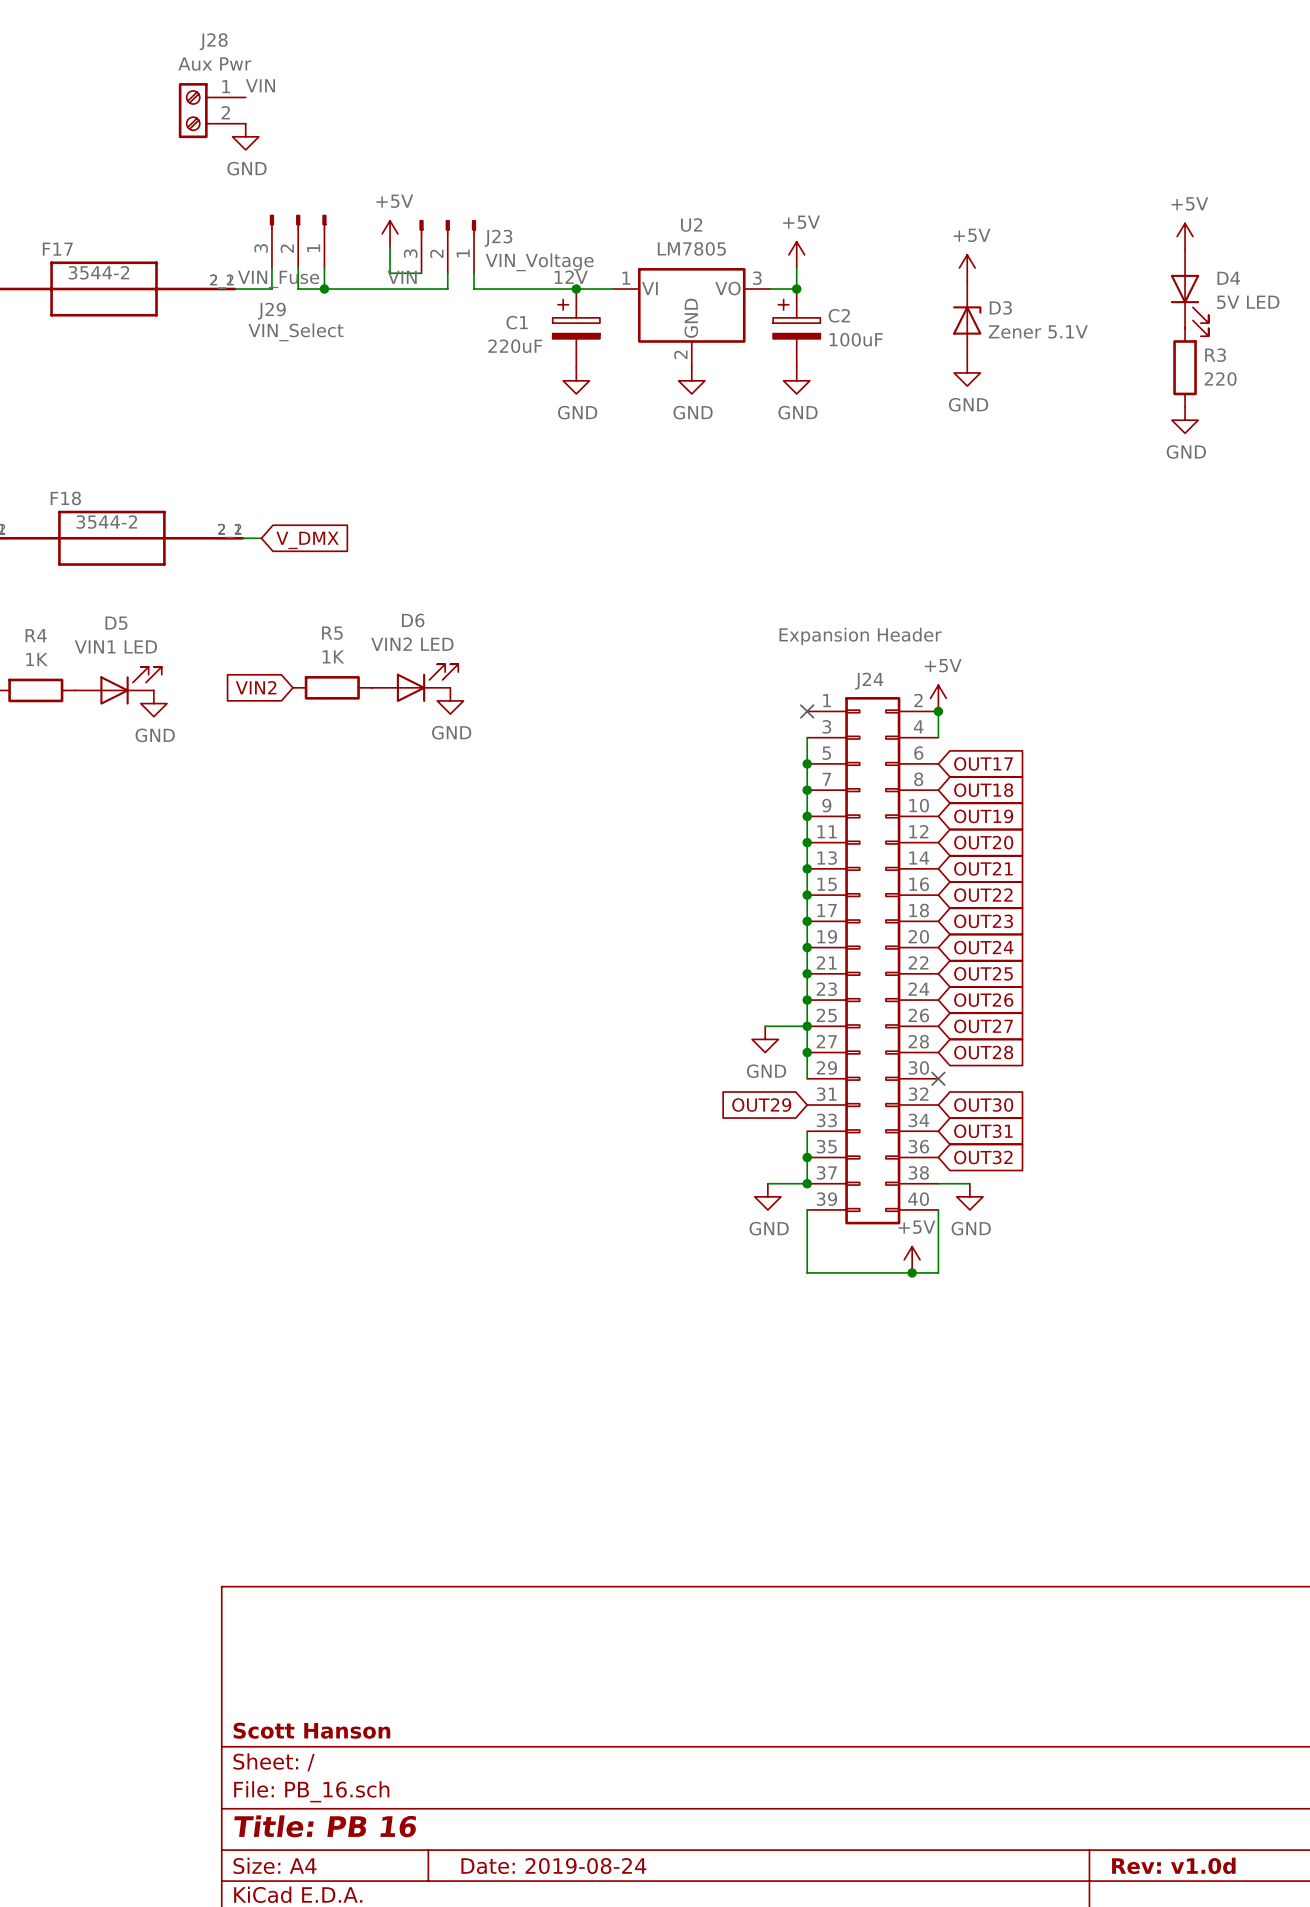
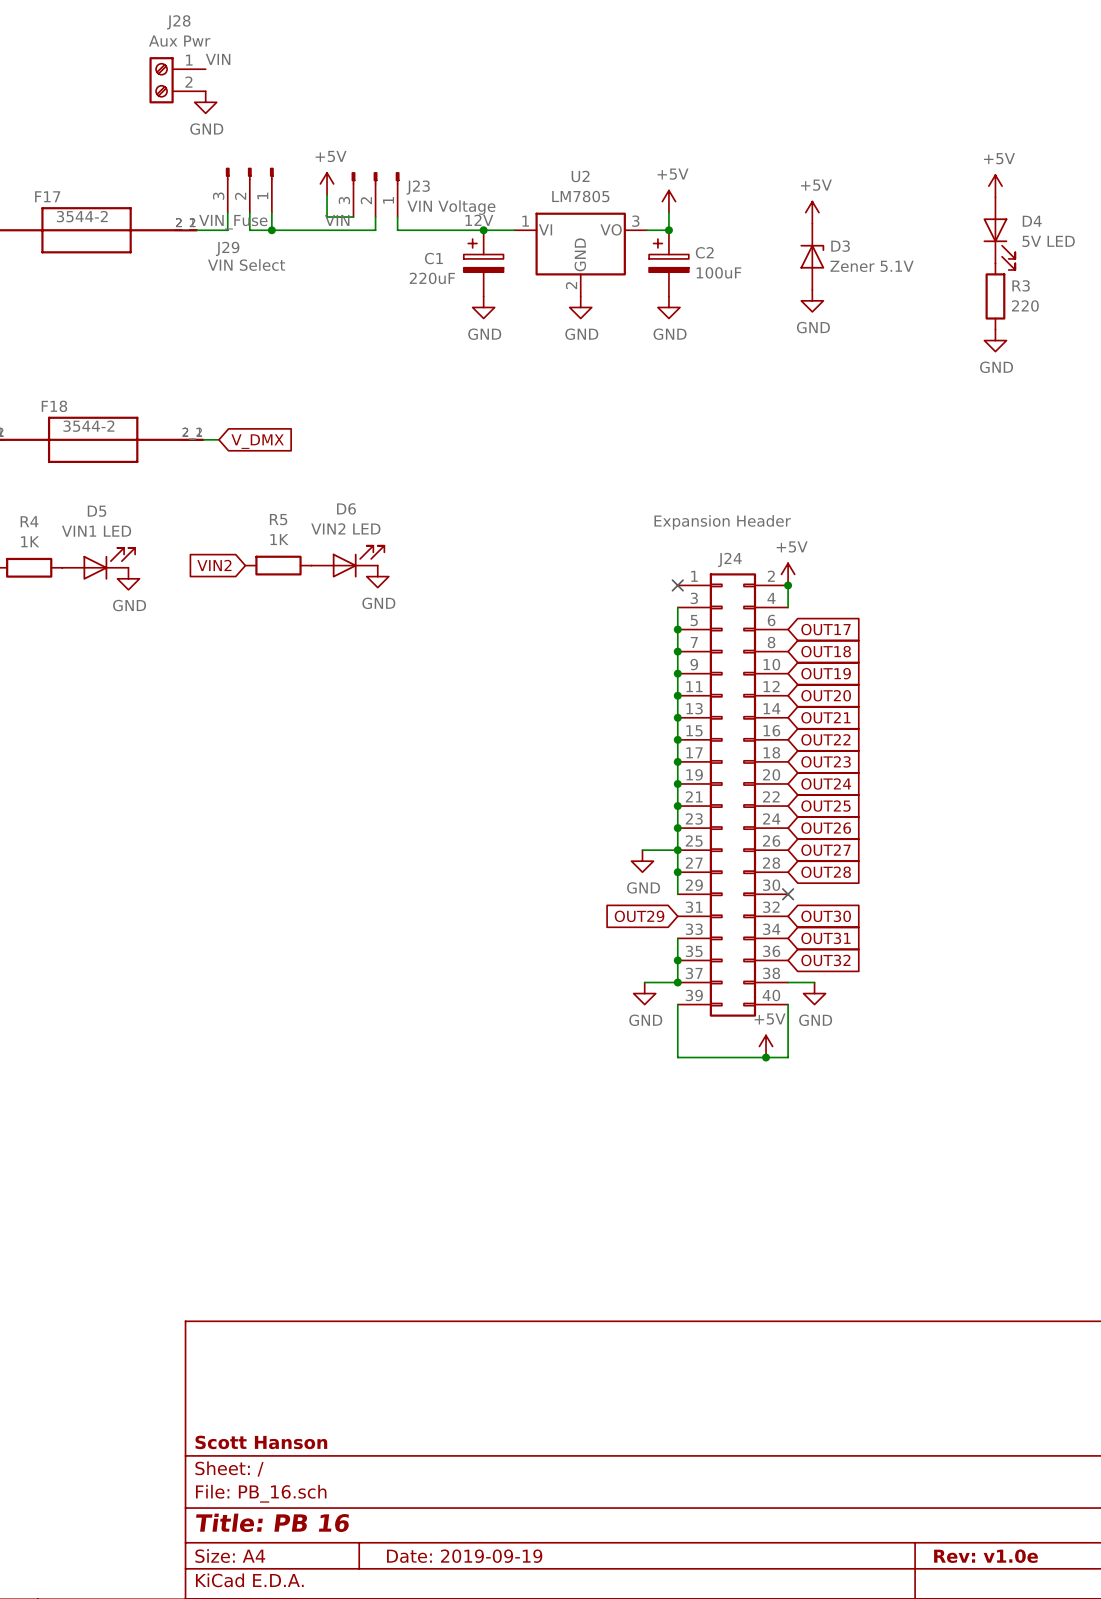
J23 value: VIN_Voltage (539, 262) -> VIN Voltage (451, 207)
J29 value: VIN_Select (295, 332) -> VIN Select (246, 265)
title block: Rev: v1.0d (1173, 1865) -> Rev: v1.0e (985, 1556)
title block: Date: 2019-08-24 (553, 1866) -> Date: 2019-09-19 (464, 1556)

